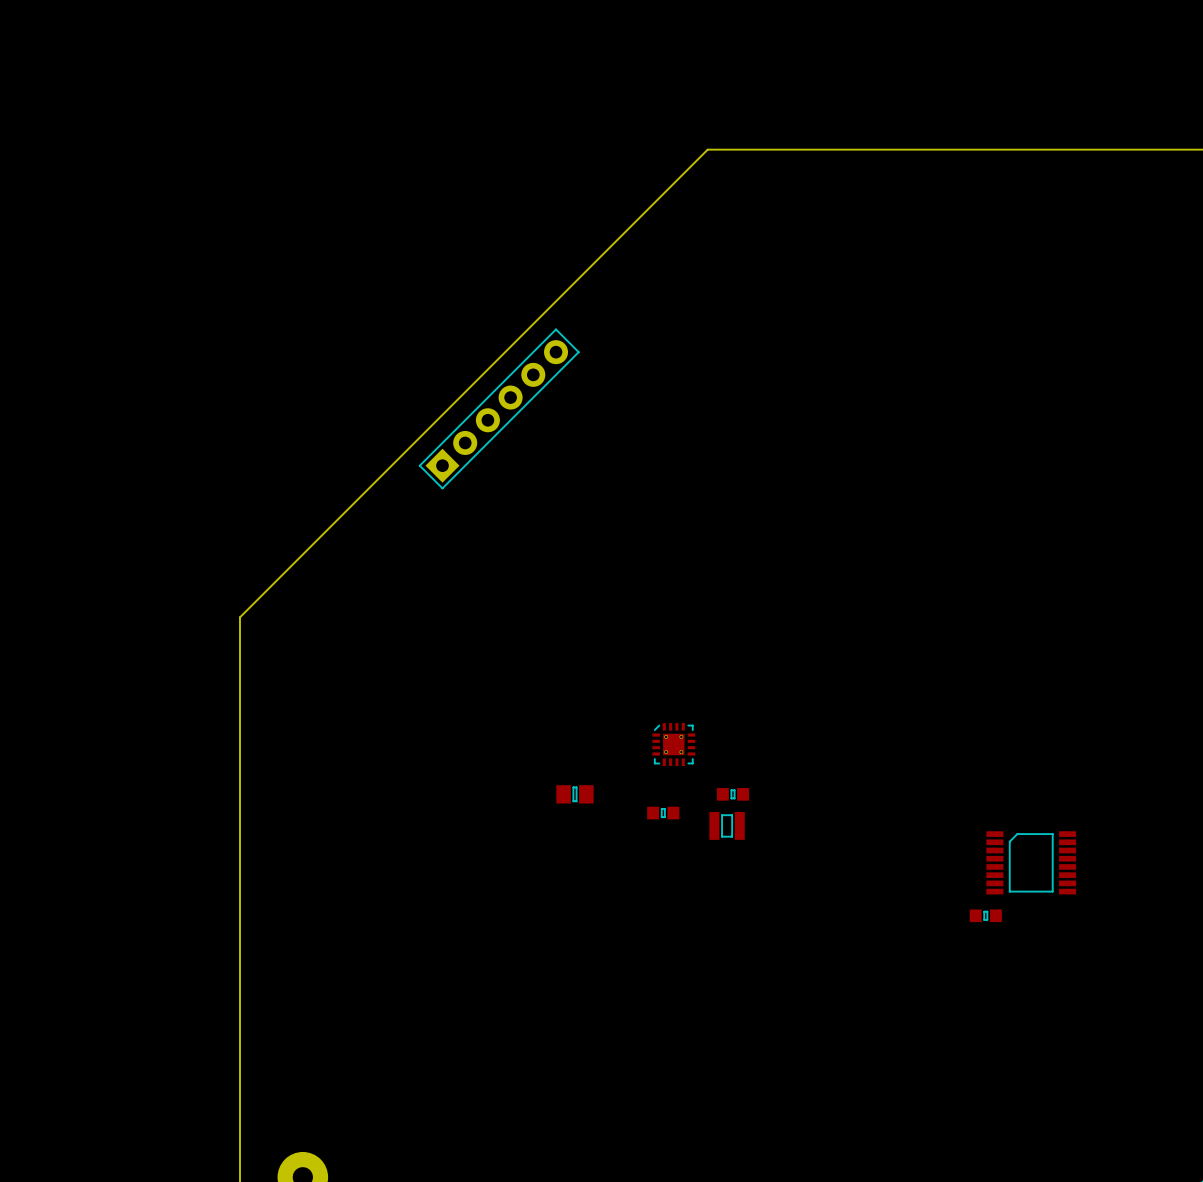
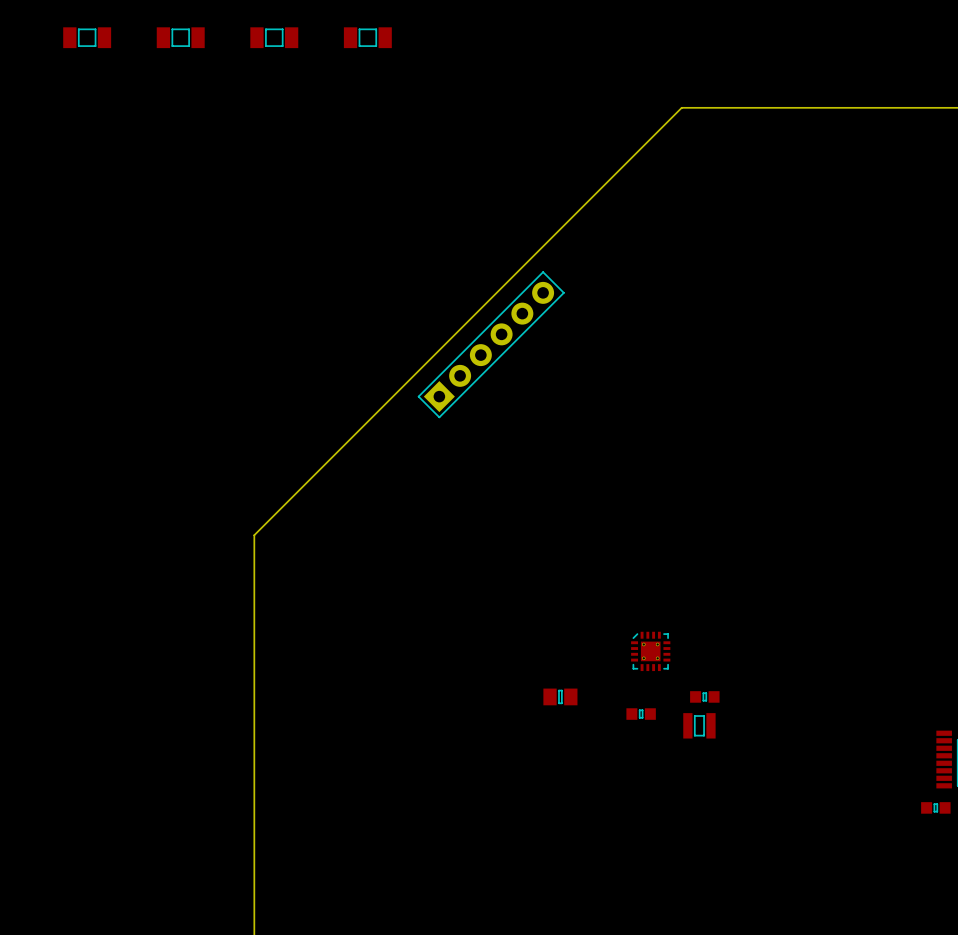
part: none -> (87, 37)
part: none -> (180, 37)
part: none -> (274, 37)
part: none -> (367, 37)

